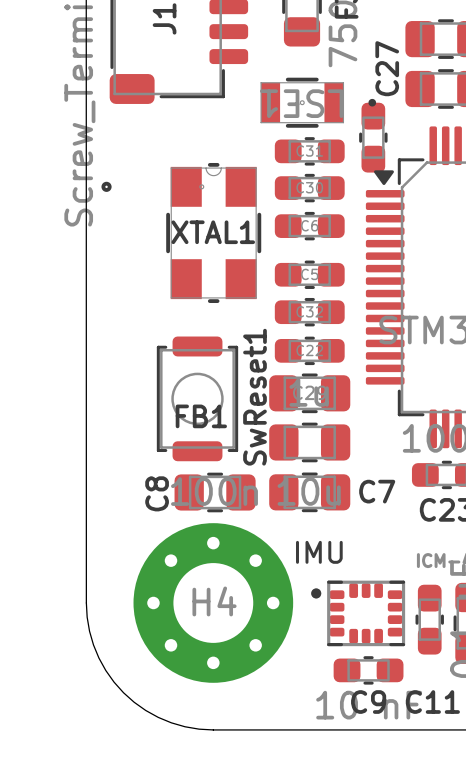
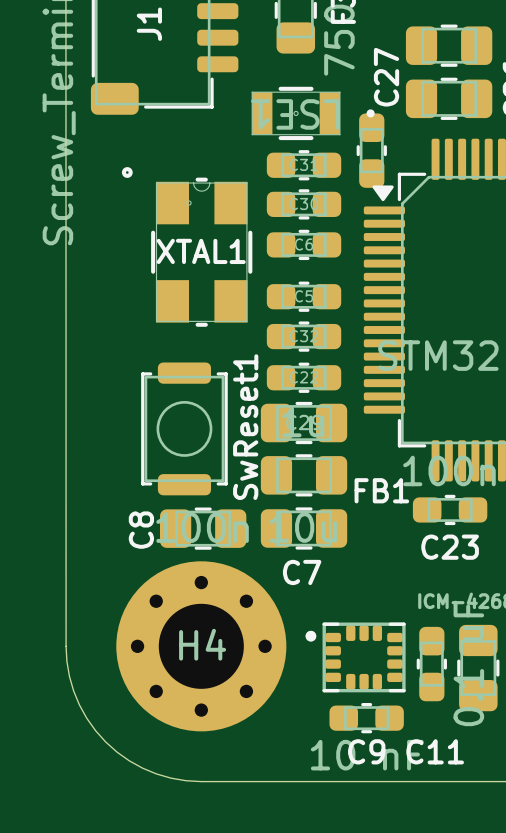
XTAL1 footprint: [101, 162, 262, 304] -> [121, 167, 253, 327]
FB1 name position: FB1 (201, 416) -> FB1 (381, 490)
C7 name position: C7 (377, 491) -> C7 (302, 572)
IMU name: IMU (319, 552) -> none

